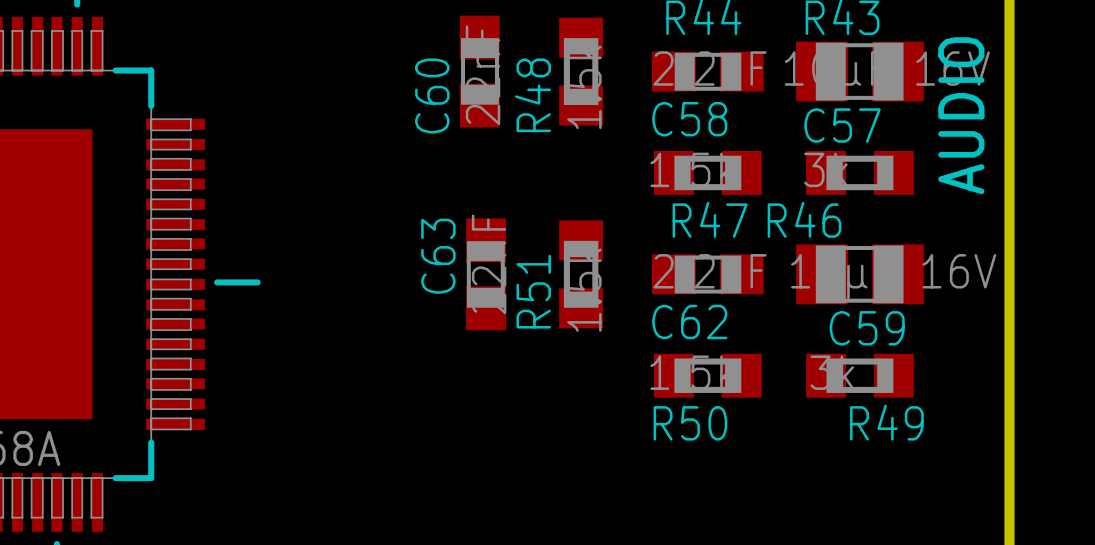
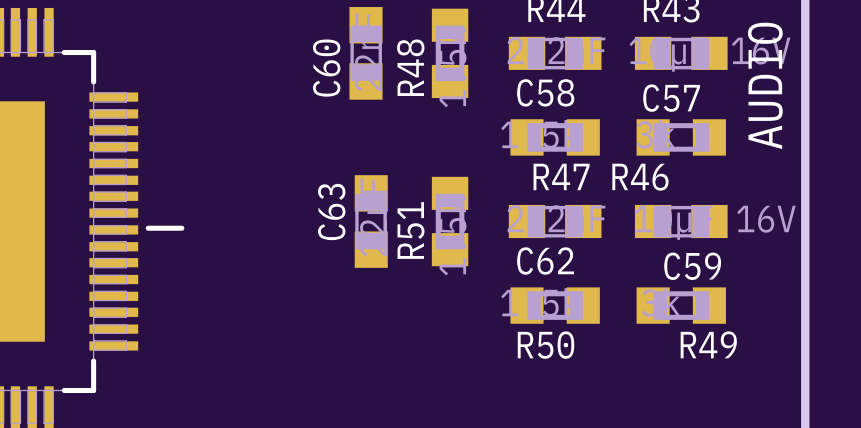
C57 footprint: [796, 41, 924, 102] -> [634, 36, 728, 70]
C59 footprint: [796, 244, 924, 305] -> [634, 204, 728, 239]

